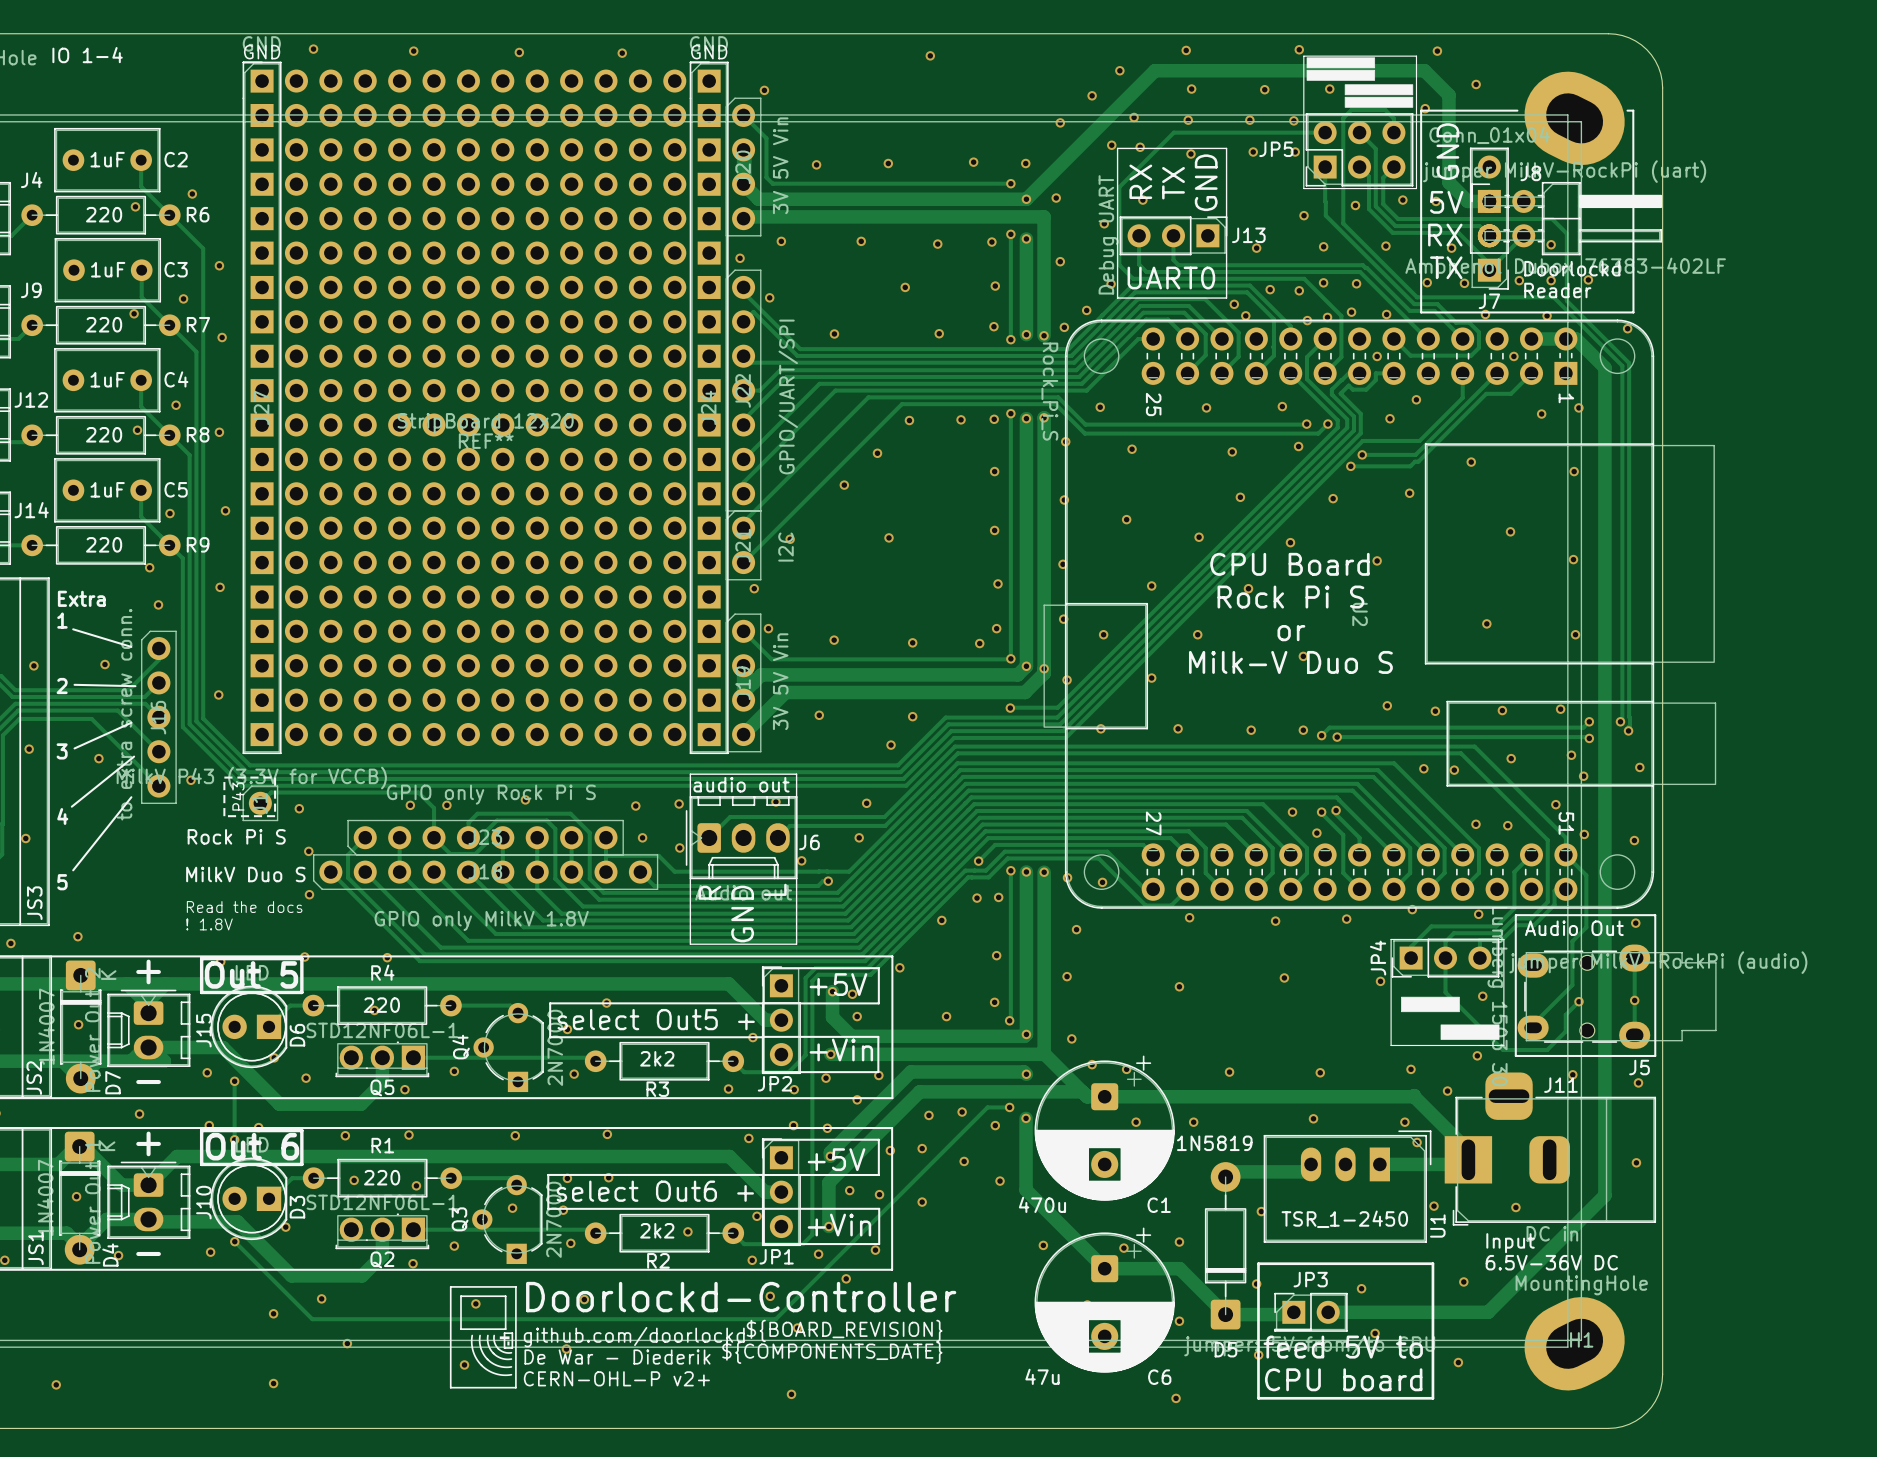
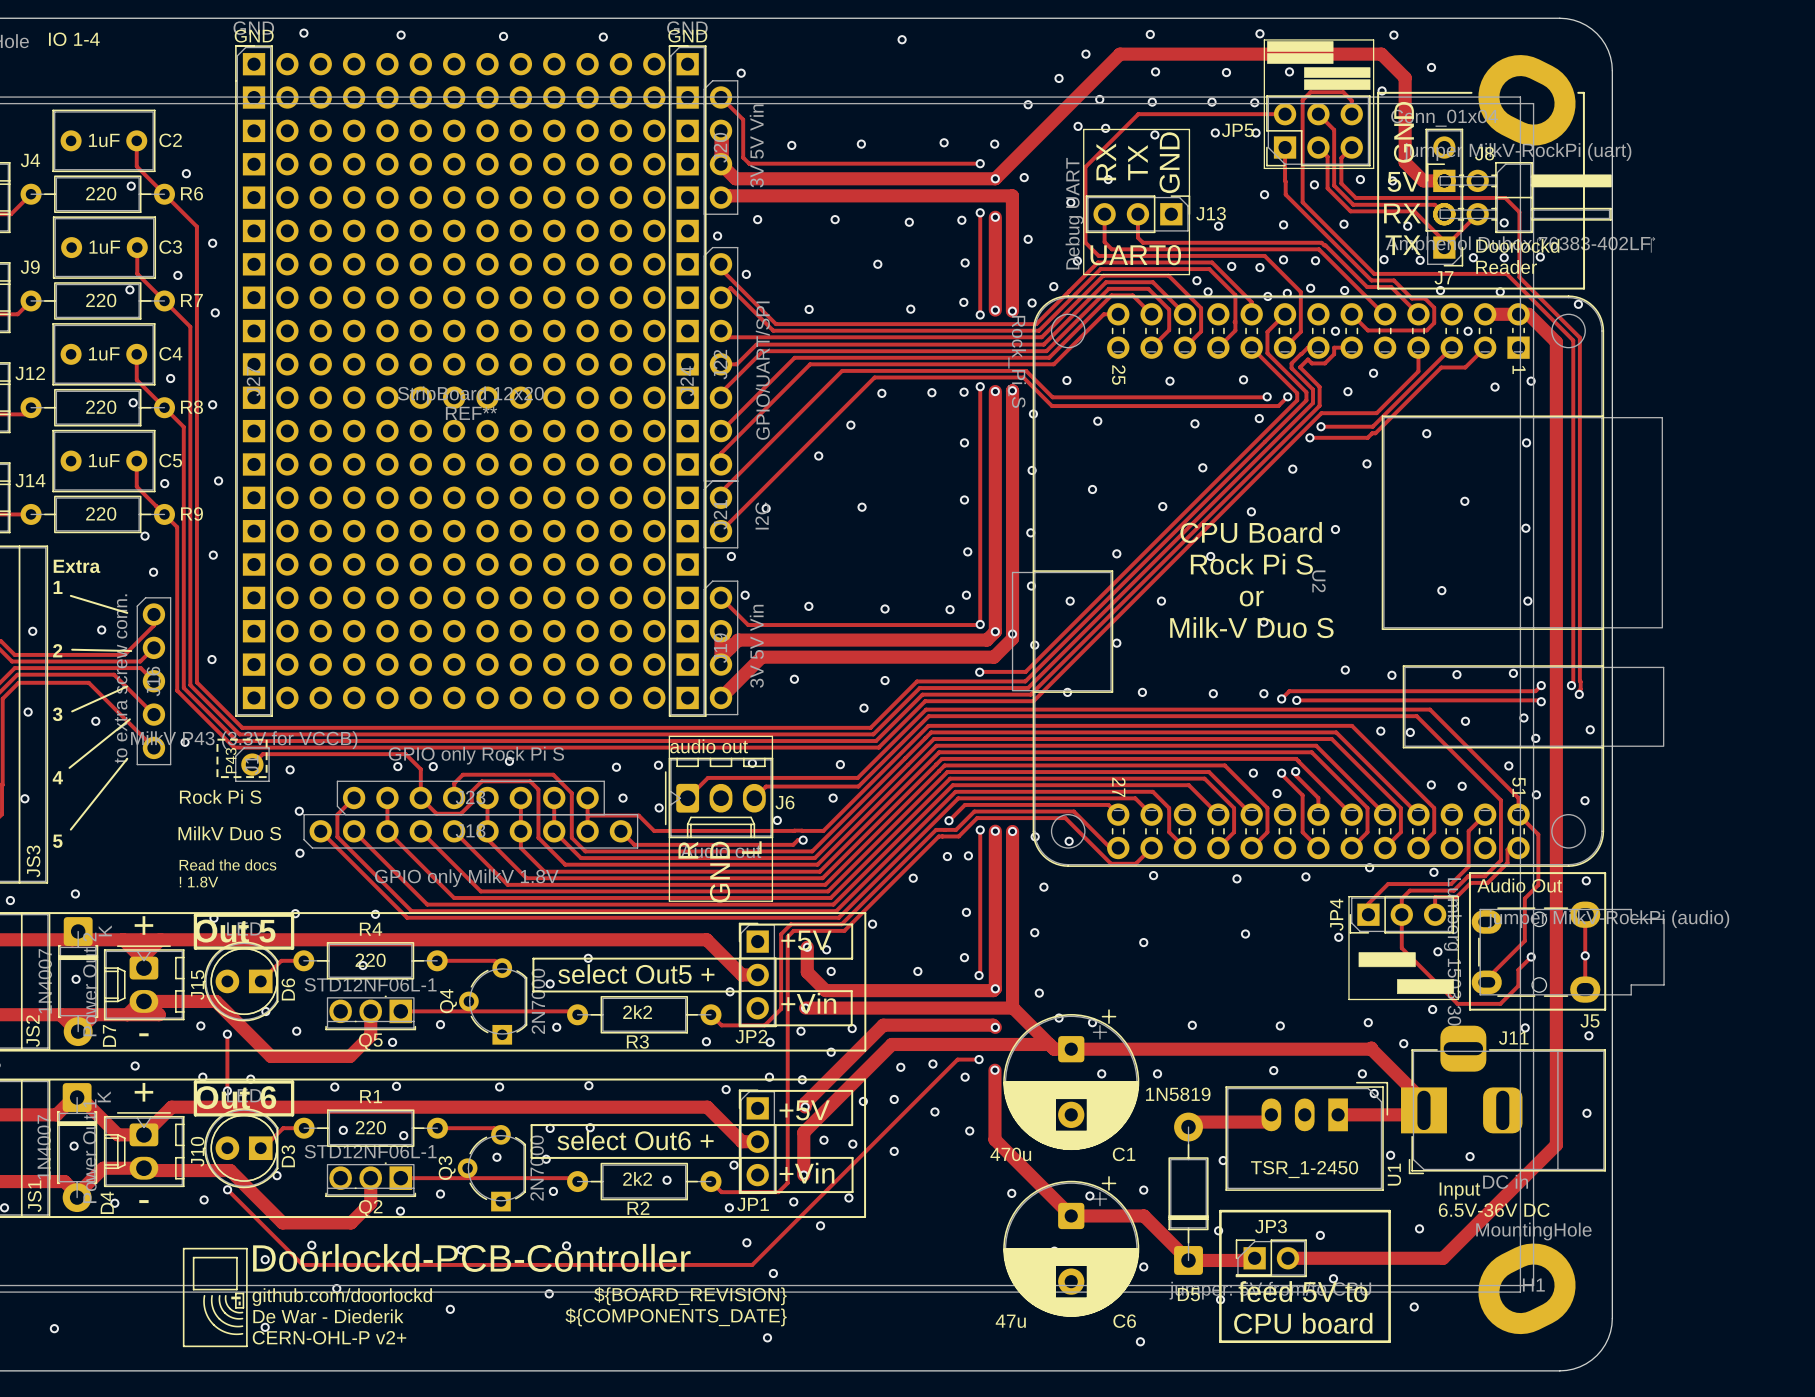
line: (450, 1286) (450, 1387) (515, 1387) (515, 1286) (450, 1286) -> (183, 1248) (183, 1346) (246, 1346) (246, 1248) (183, 1248)
line: (460, 1296) (460, 1329) (505, 1329) (505, 1296) (460, 1296) -> (193, 1257) (193, 1289) (236, 1289) (236, 1257) (193, 1257)
text: Doorlockd-Controller (741, 1297) -> Doorlockd-PCB-Controller (471, 1257)
text position: ${BOARD_REVISION} (844, 1330) -> ${BOARD_REVISION} (690, 1296)
line: (504, 1333) (504, 1348) (512, 1348) (512, 1333) (504, 1333) -> (235, 1293) (235, 1307) (243, 1307) (243, 1293) (235, 1293)
line: (472, 1335) (473, 1351) (481, 1365) (495, 1373) (511, 1374) -> (204, 1295) (205, 1311) (213, 1324) (226, 1332) (242, 1333)
line: (480, 1335) (480, 1348) (487, 1359) (498, 1366) (511, 1366) -> (212, 1295) (212, 1308) (219, 1318) (230, 1325) (242, 1326)
line: (487, 1335) (488, 1345) (493, 1353) (501, 1358) (511, 1359) -> (219, 1295) (220, 1305) (225, 1313) (233, 1317) (242, 1318)
line: (494, 1335) (494, 1342) (498, 1348) (504, 1352) (511, 1352) -> (225, 1295) (226, 1302) (229, 1308) (235, 1312) (242, 1312)
drawing position: (504, 1337) -> (235, 1297)
text position: github.com/doorlockd (634, 1337) -> github.com/doorlockd (342, 1297)
drawing position: (508, 1343) -> (239, 1303)
text position: ${COMPONENTS_DATE} (832, 1352) -> ${COMPONENTS_DATE} (676, 1317)
text position: De War - Diederik (617, 1357) -> De War - Diederik (328, 1316)
text position: CERN-OHL-P v2+ (616, 1378) -> CERN-OHL-P v2+ (329, 1337)

